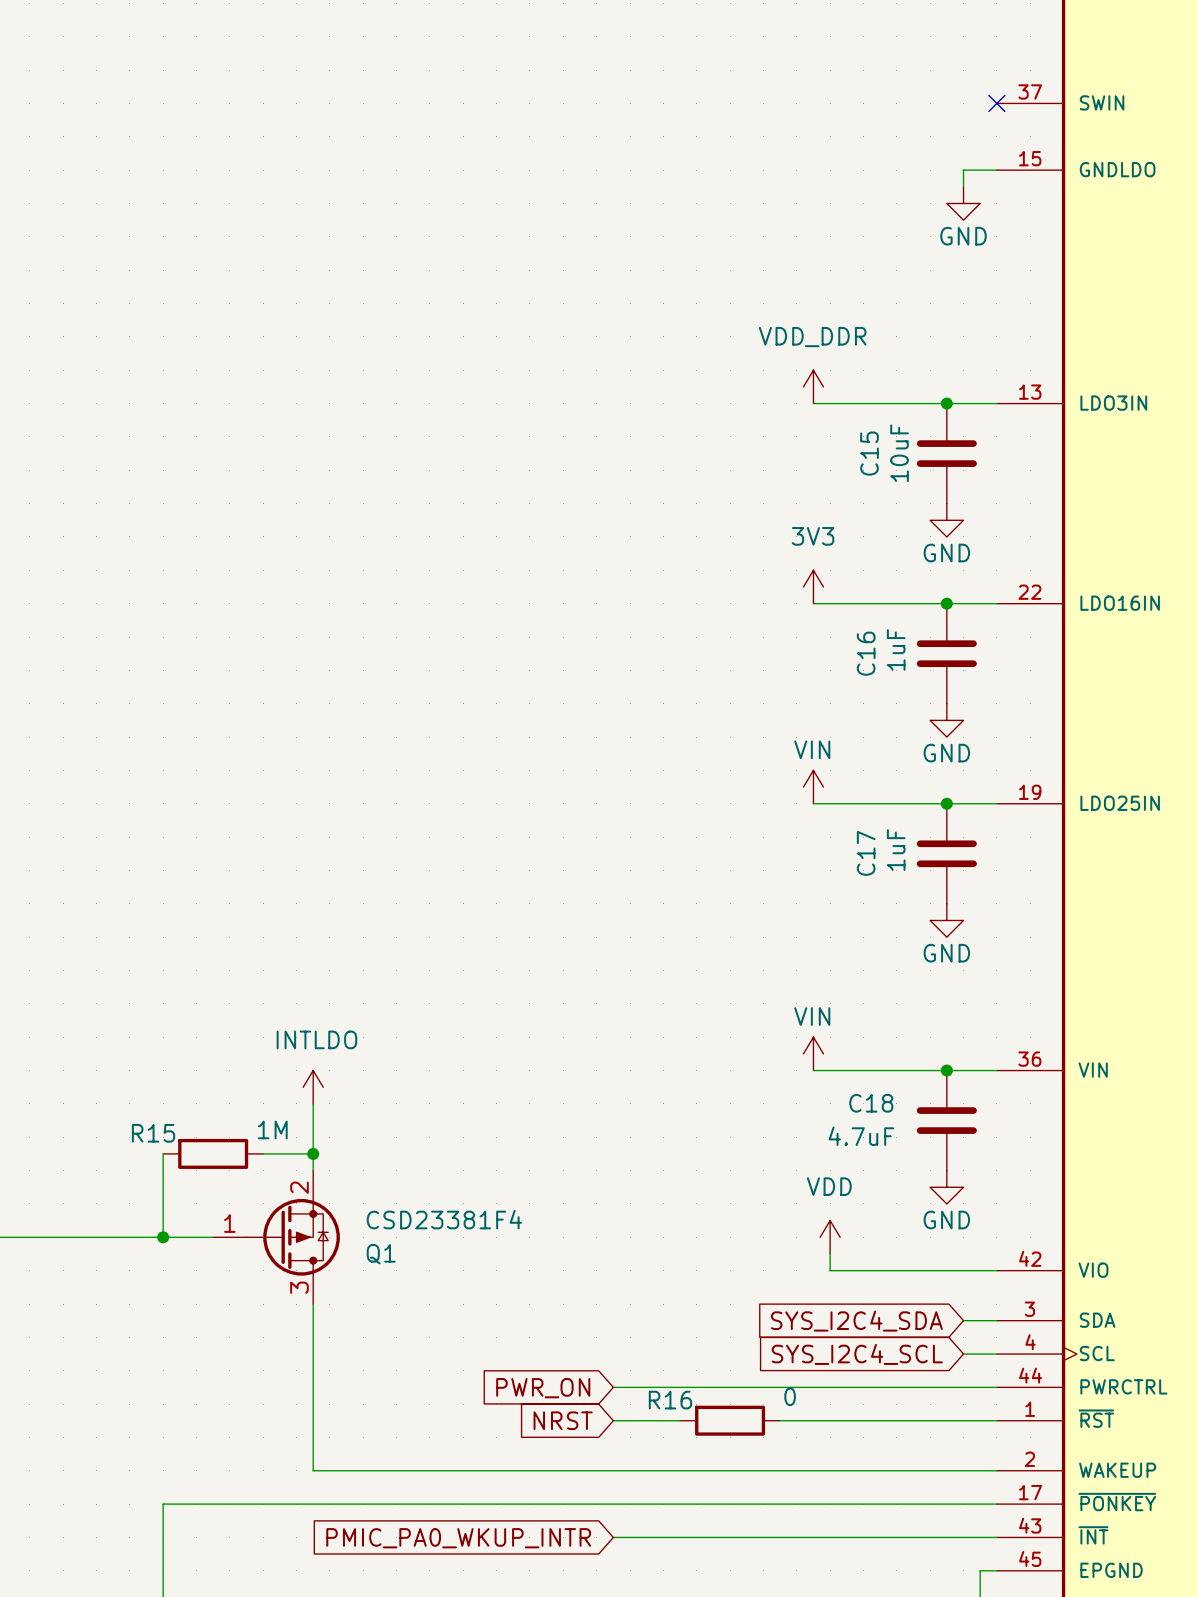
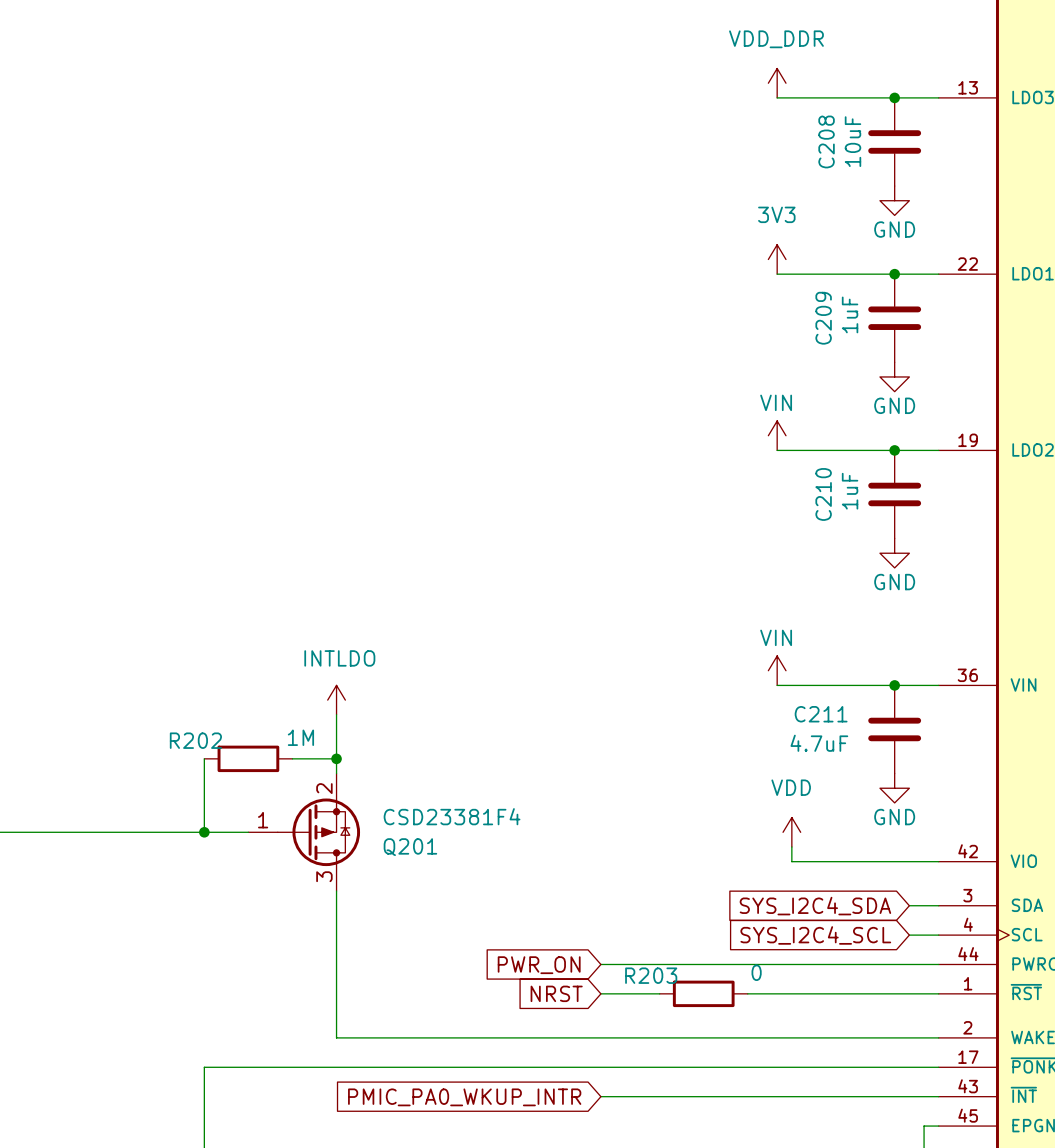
C15 name: C15 (869, 453) -> C208 (826, 141)
C16 name: C16 (866, 653) -> C209 (823, 318)
C17 name: C17 (866, 853) -> C210 (823, 494)
C18 name: C18 (871, 1103) -> C211 (821, 714)
R15 name: R15 (153, 1133) -> R202 (195, 740)
Q1 name: Q1 (381, 1254) -> Q201 (410, 847)
R16 name: R16 (670, 1400) -> R203 (651, 975)

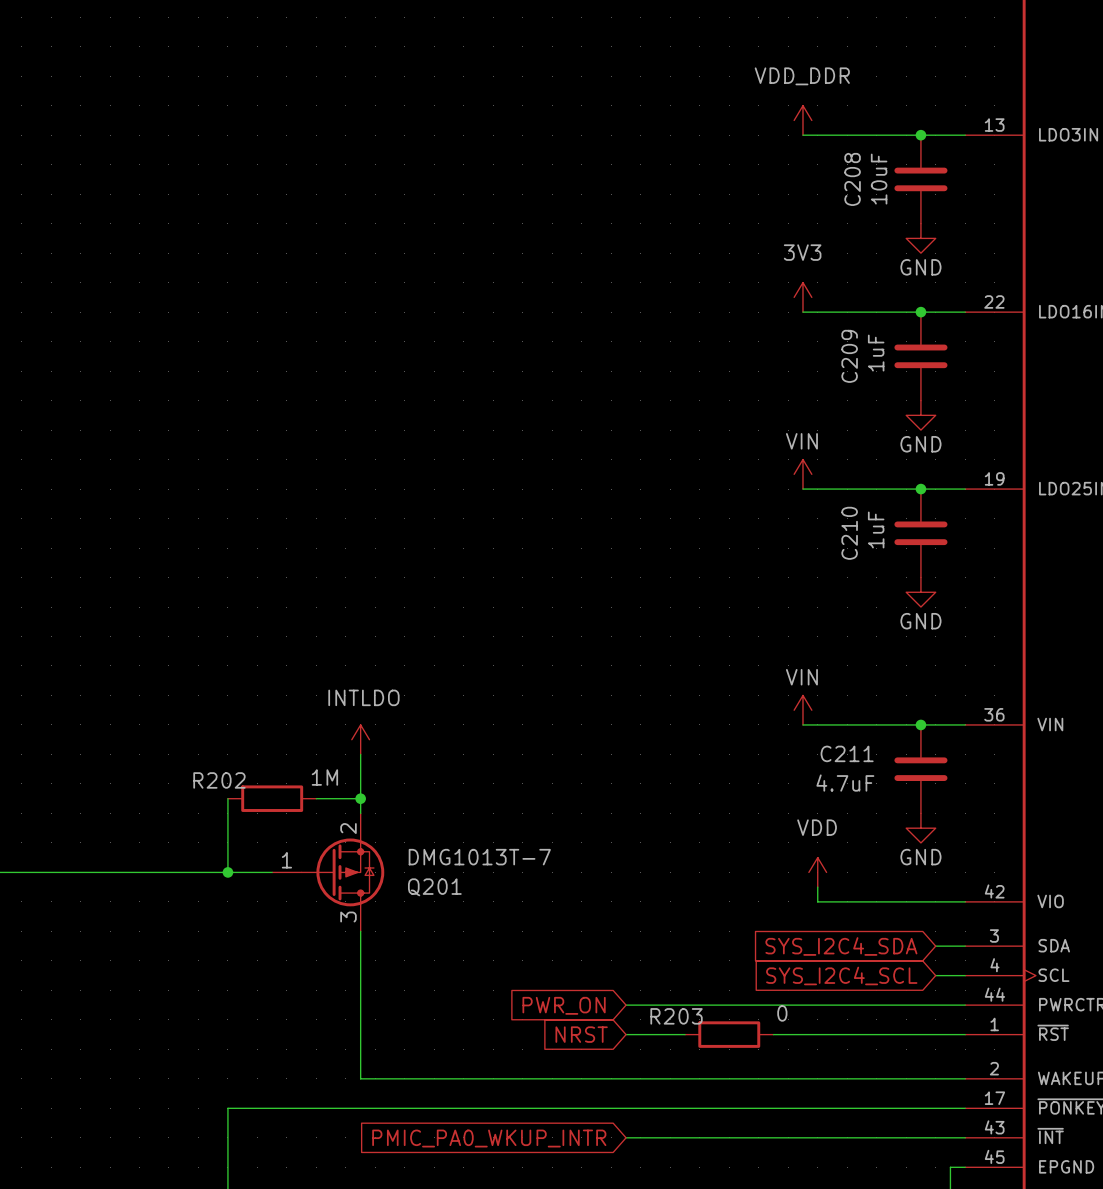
Q201 value: CSD23381F4 (452, 816) -> DMG1013T-7 (479, 857)

